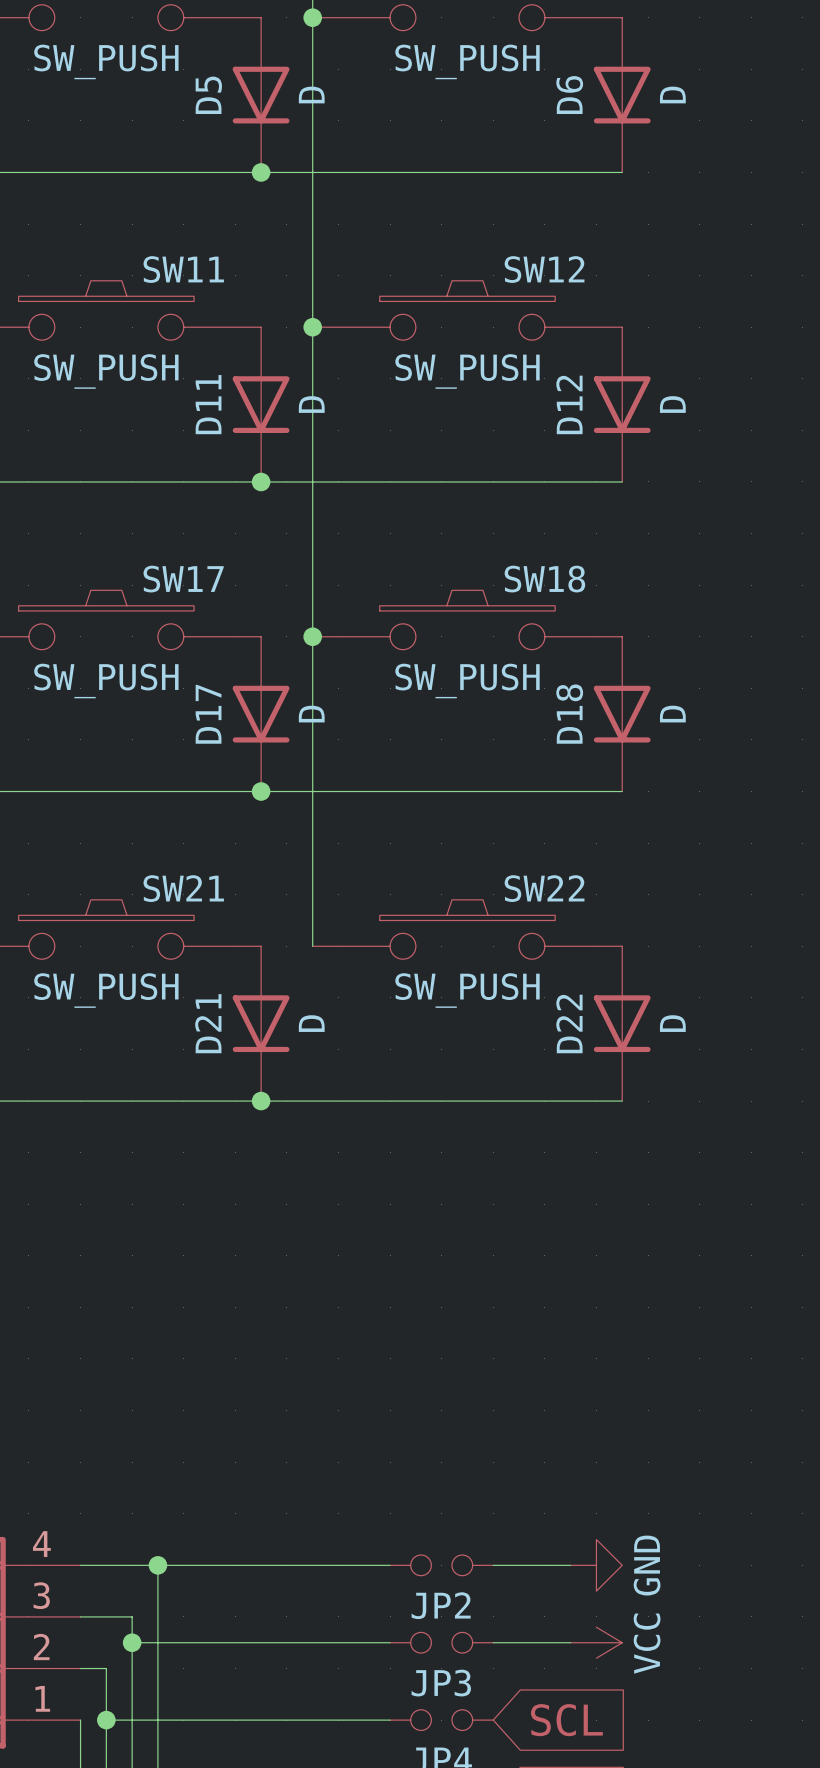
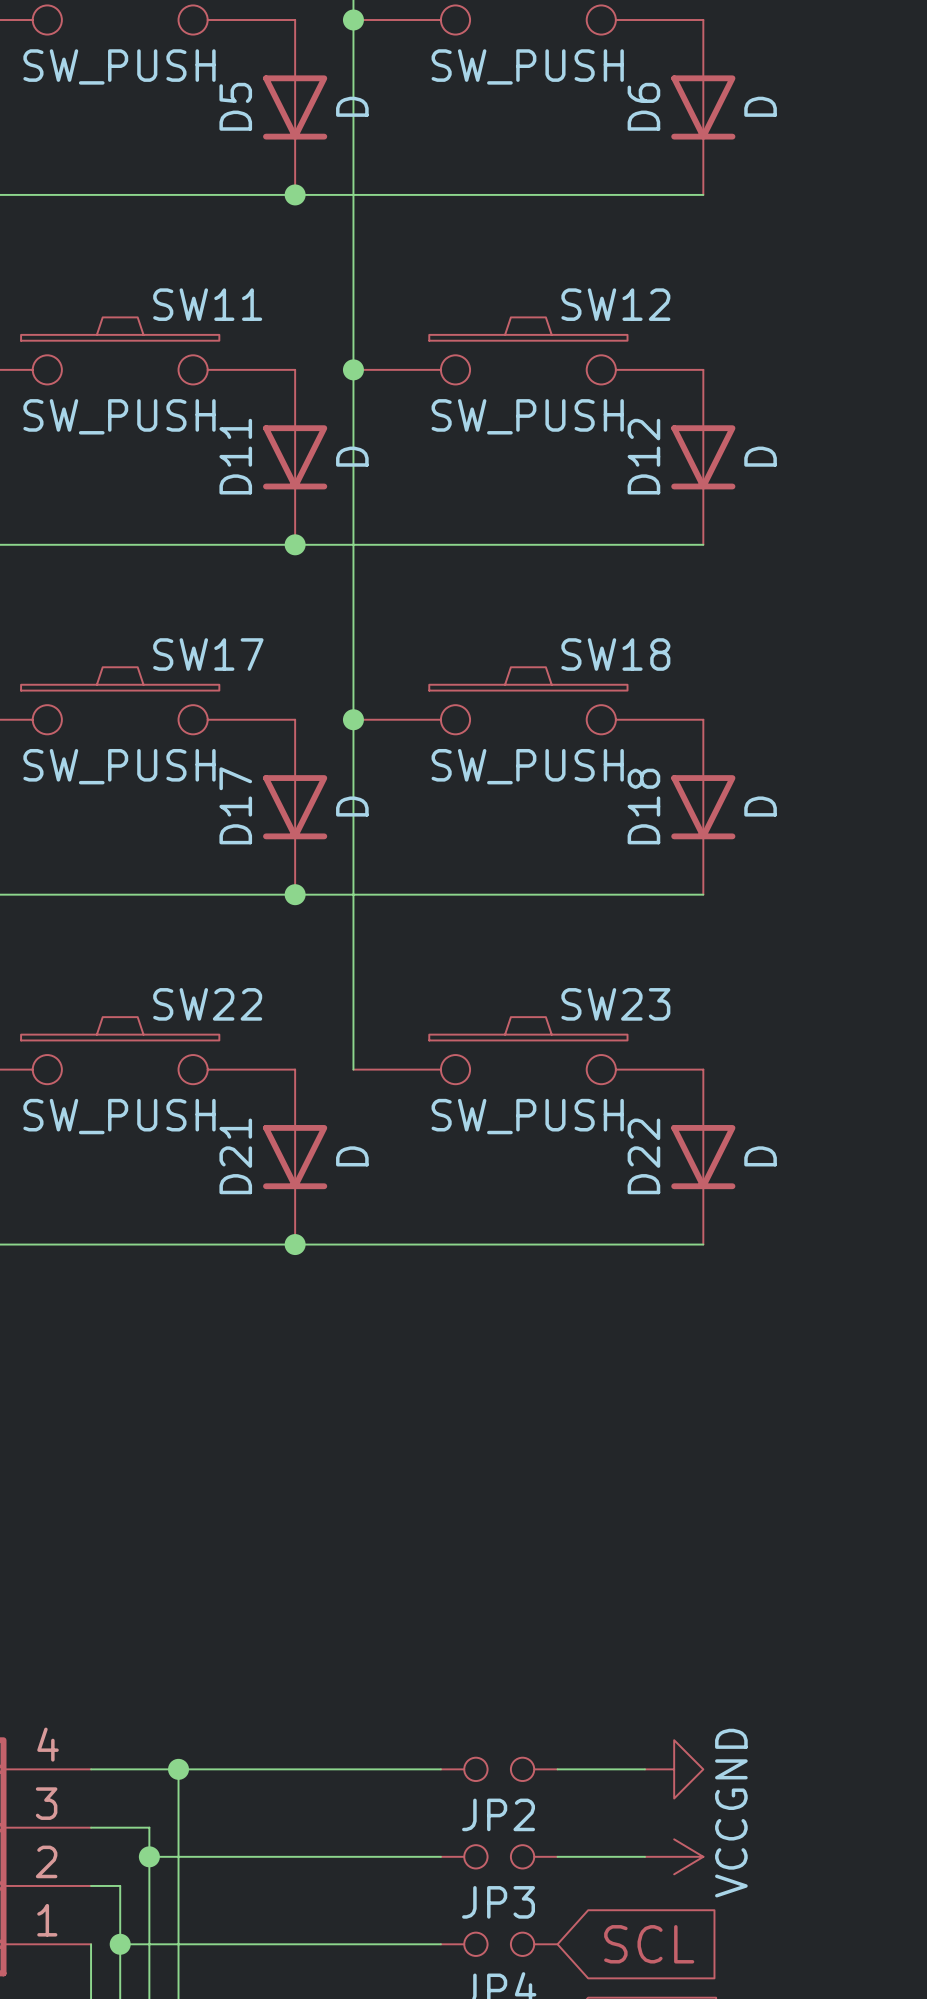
SW21 name: SW21 (183, 888) -> SW22 (207, 1004)
SW22 name: SW22 (544, 888) -> SW23 (615, 1004)

